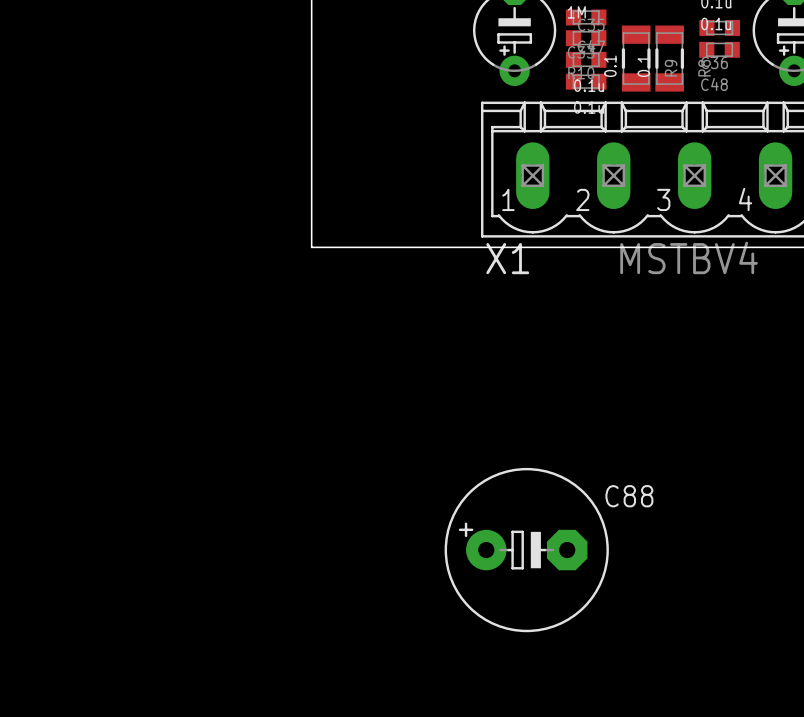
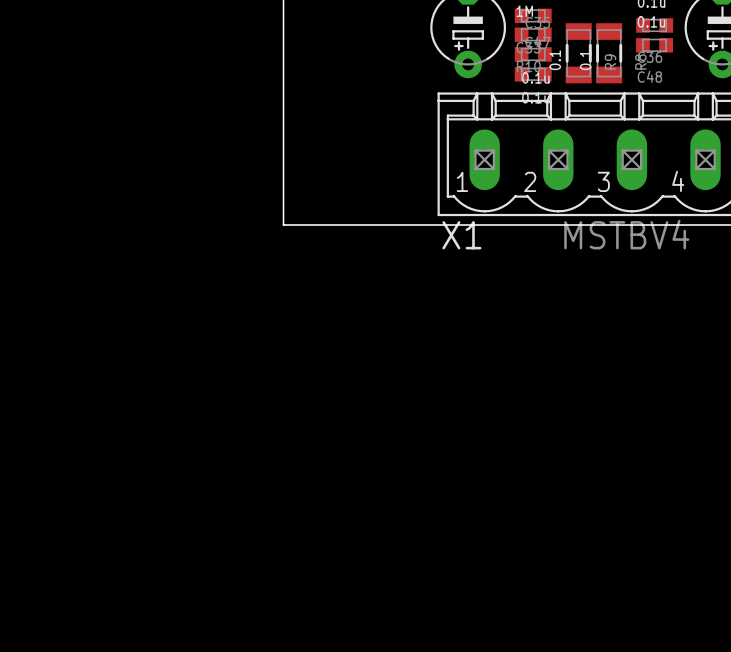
C88: (526, 550) -> none

